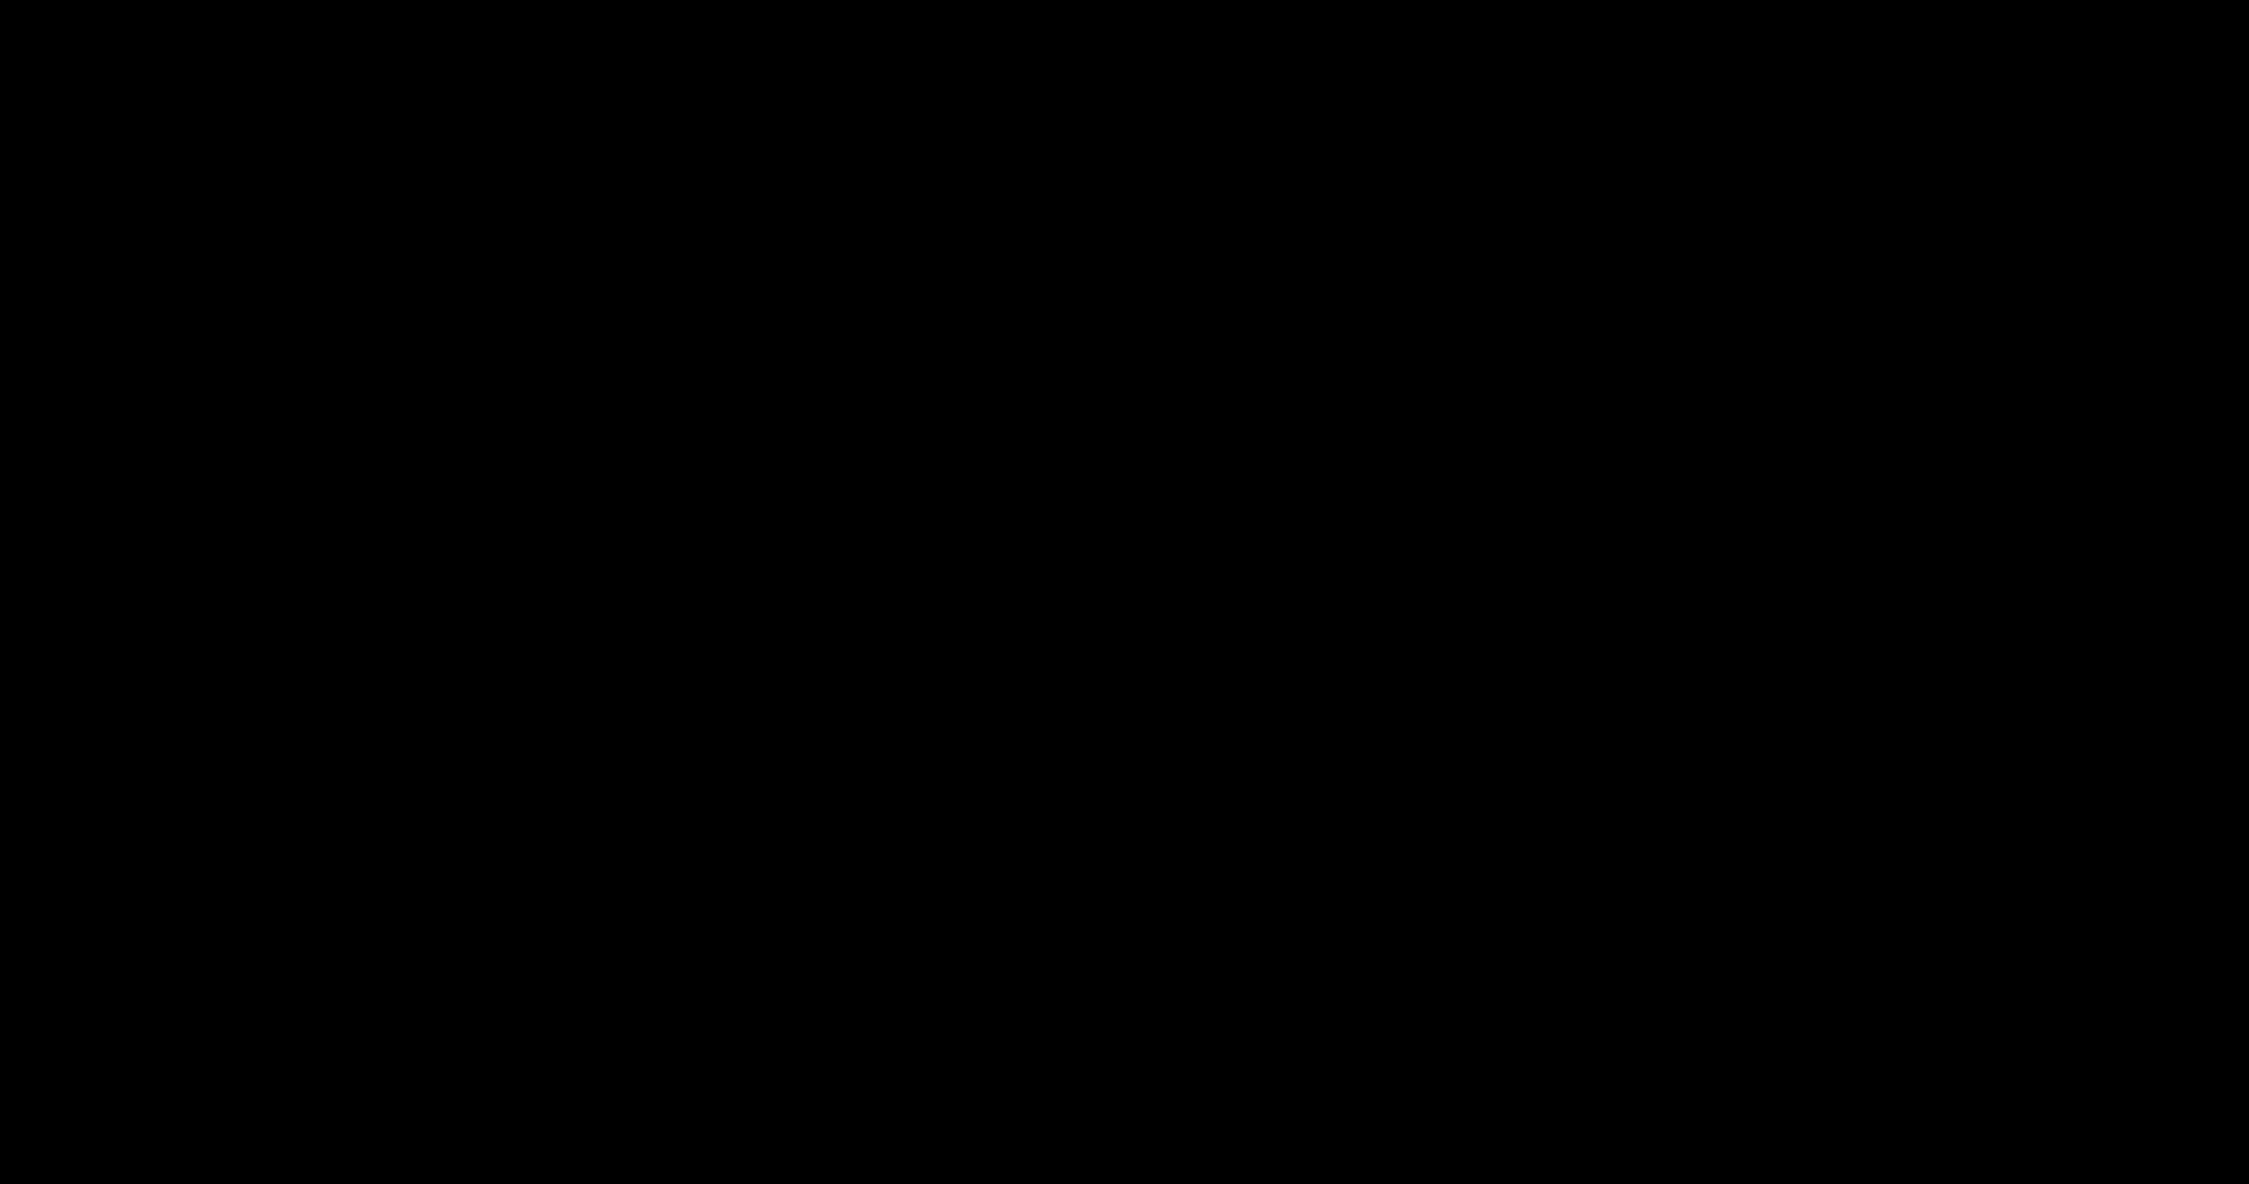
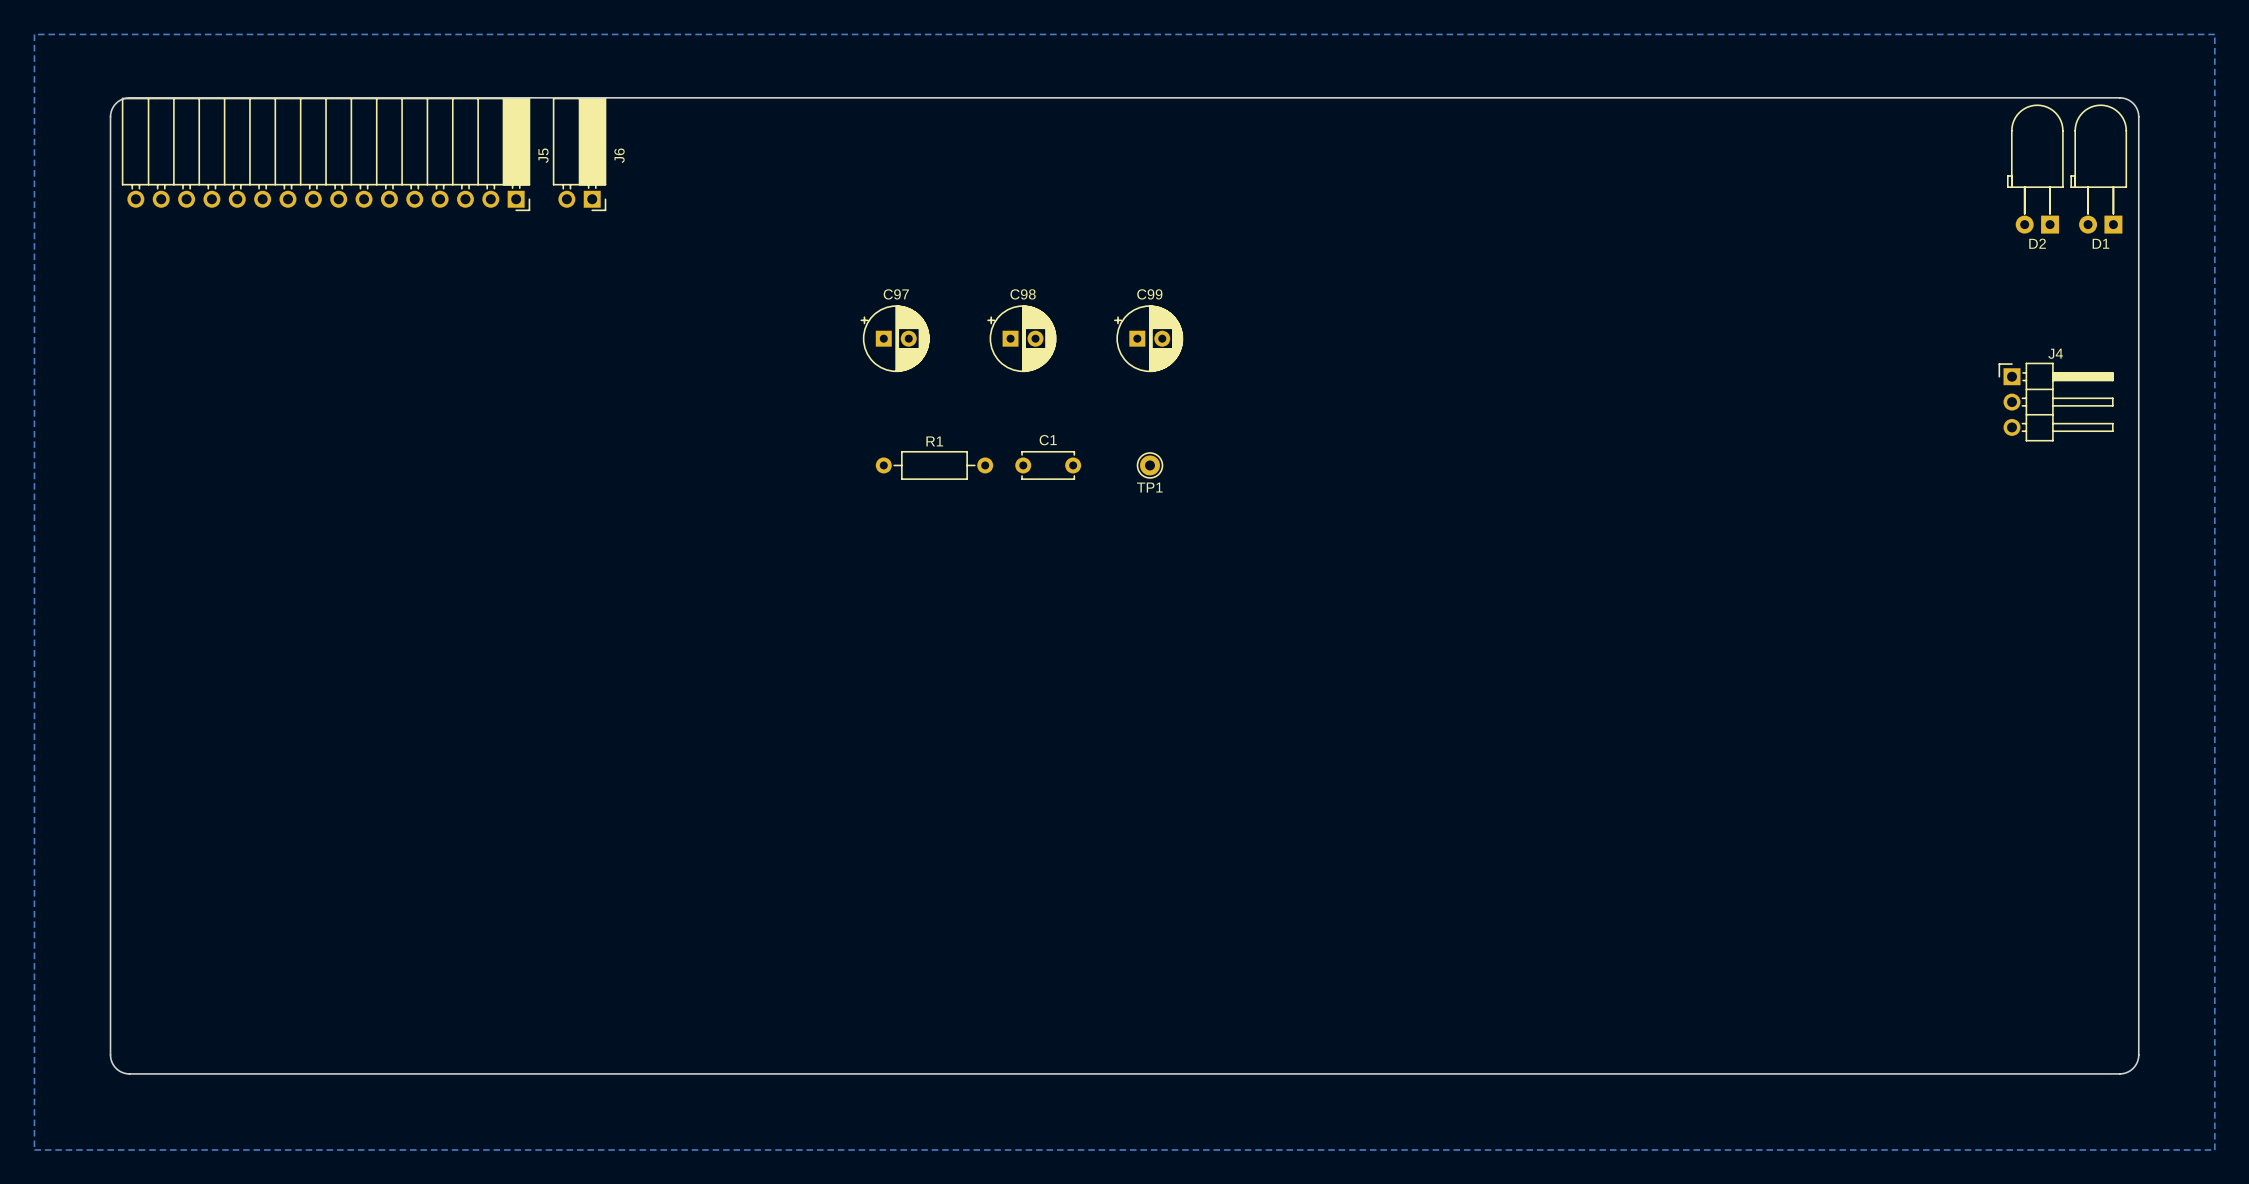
bottom zone outline: none -> (34, 34) (34, 1150) (2214, 1150) (2214, 34) (34, 34)
board edge: none -> (129, 97) (2127, 99) (2136, 107) (2138, 116) (2137, 1062) (2129, 1071) (2119, 1073) (122, 1072) (114, 1066) (110, 1054) (110, 116) (116, 103) (129, 97)
J5: none -> (326, 154)
J6: none -> (579, 154)
D2: none -> (2035, 169)
D1: none -> (2098, 169)
C97: none -> (895, 338)
C98: none -> (1021, 338)
C99: none -> (1148, 338)
J4: none -> (2056, 402)
R1: none -> (934, 465)
C1: none -> (1048, 465)
TP1: none -> (1150, 465)

